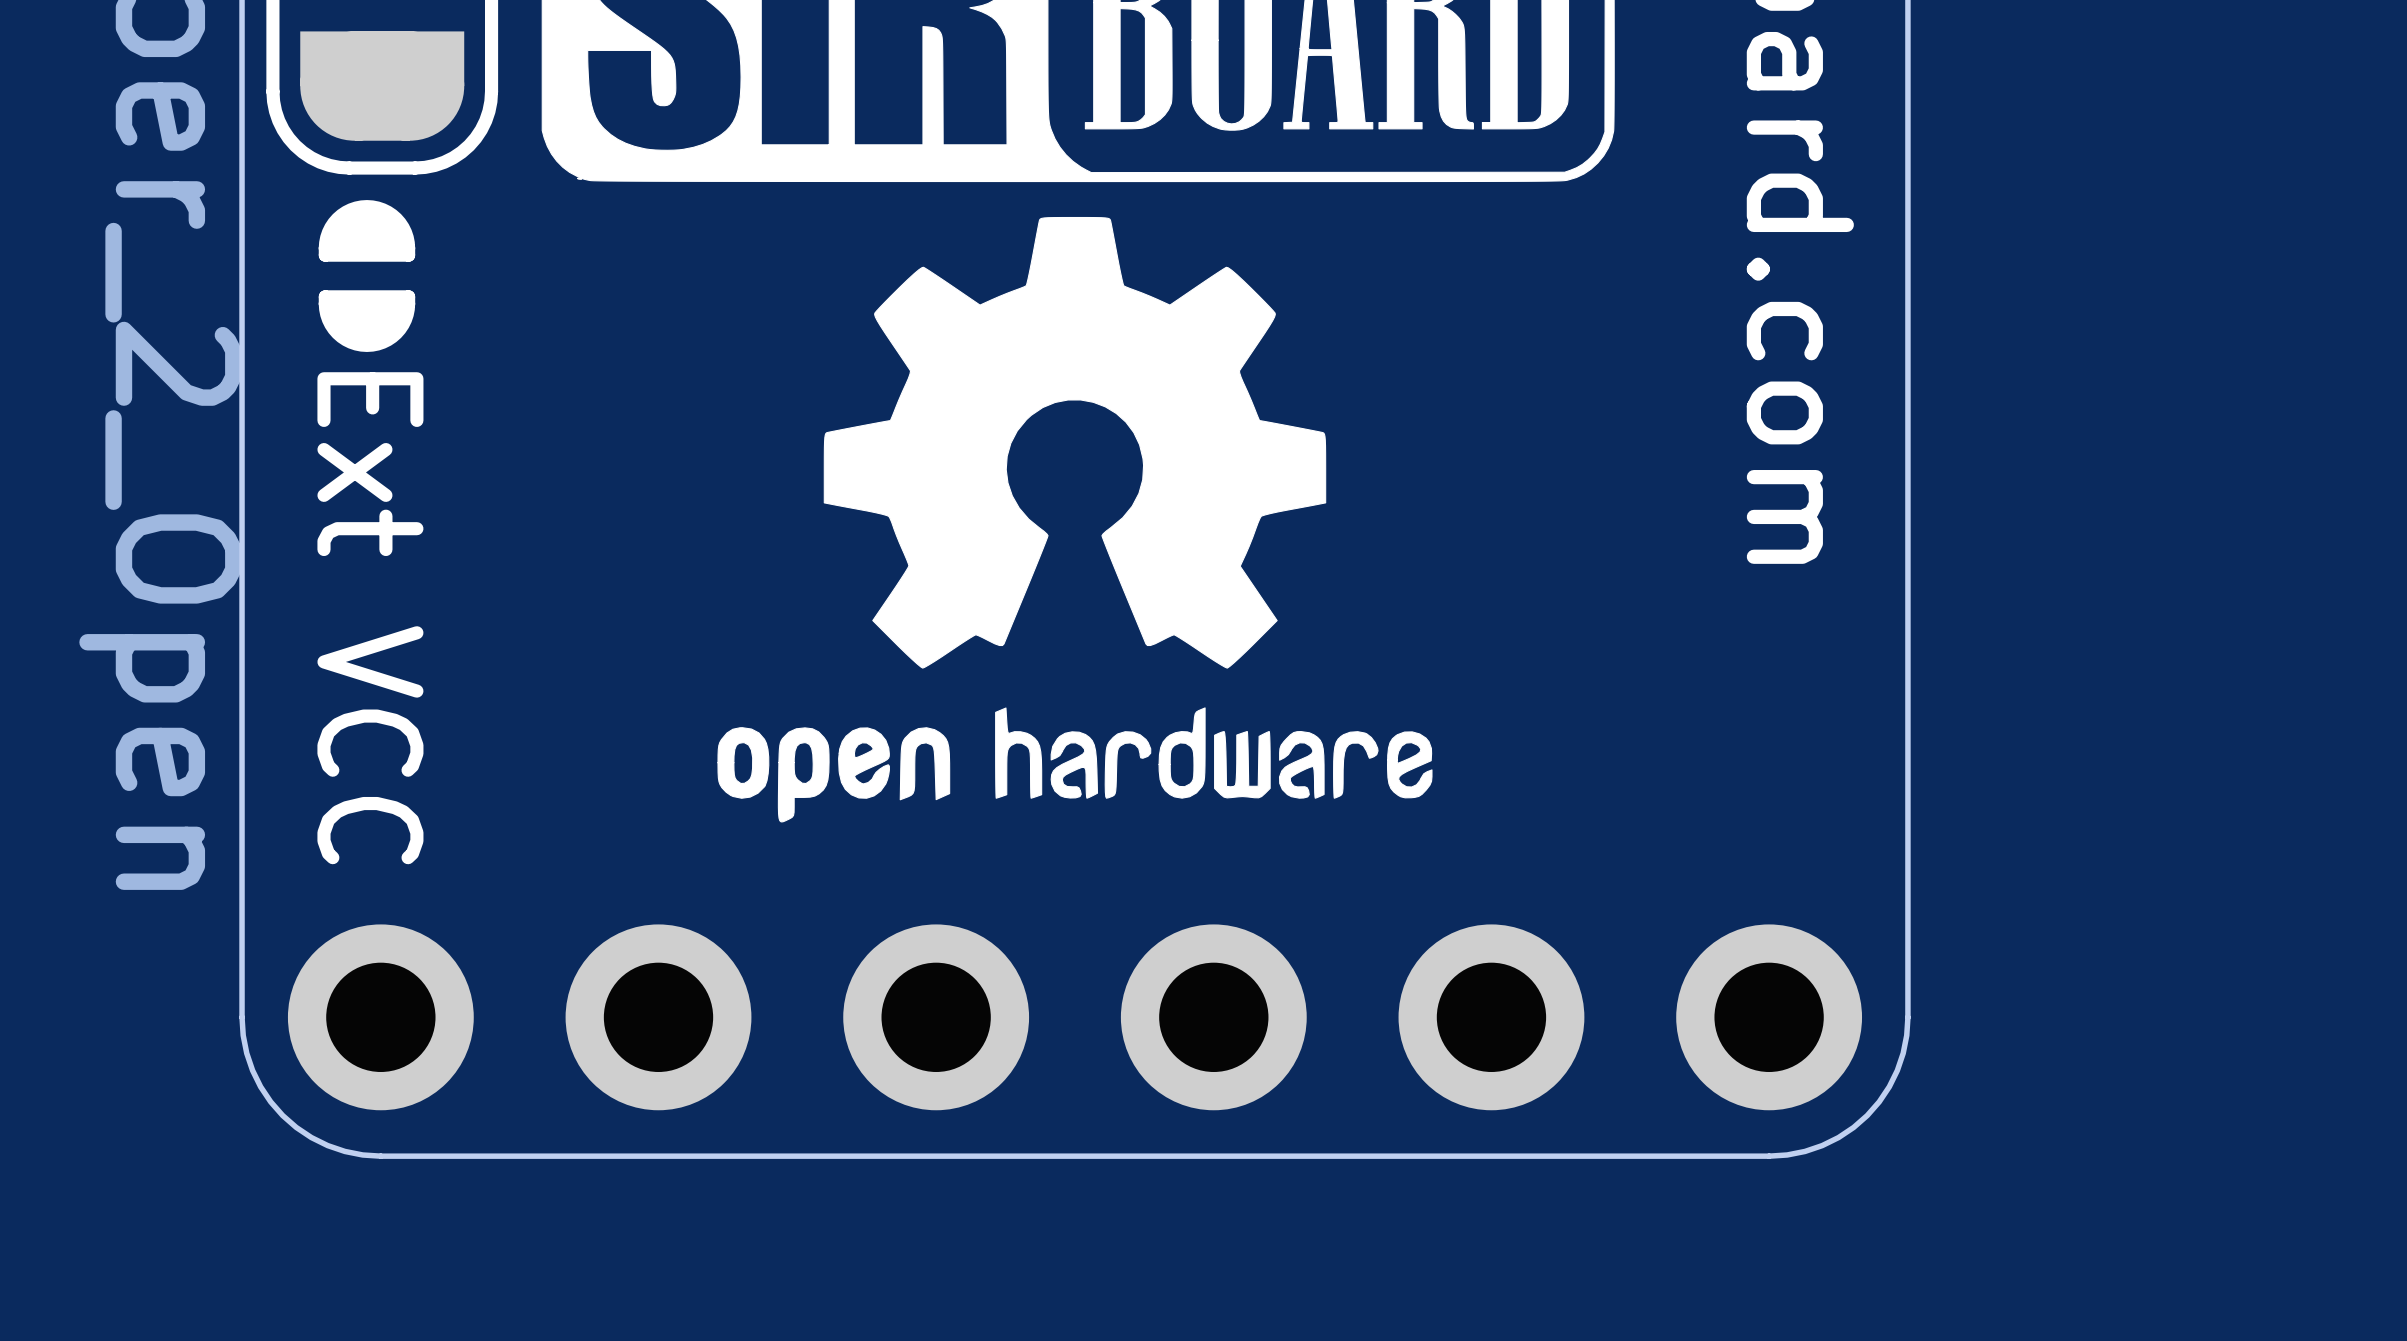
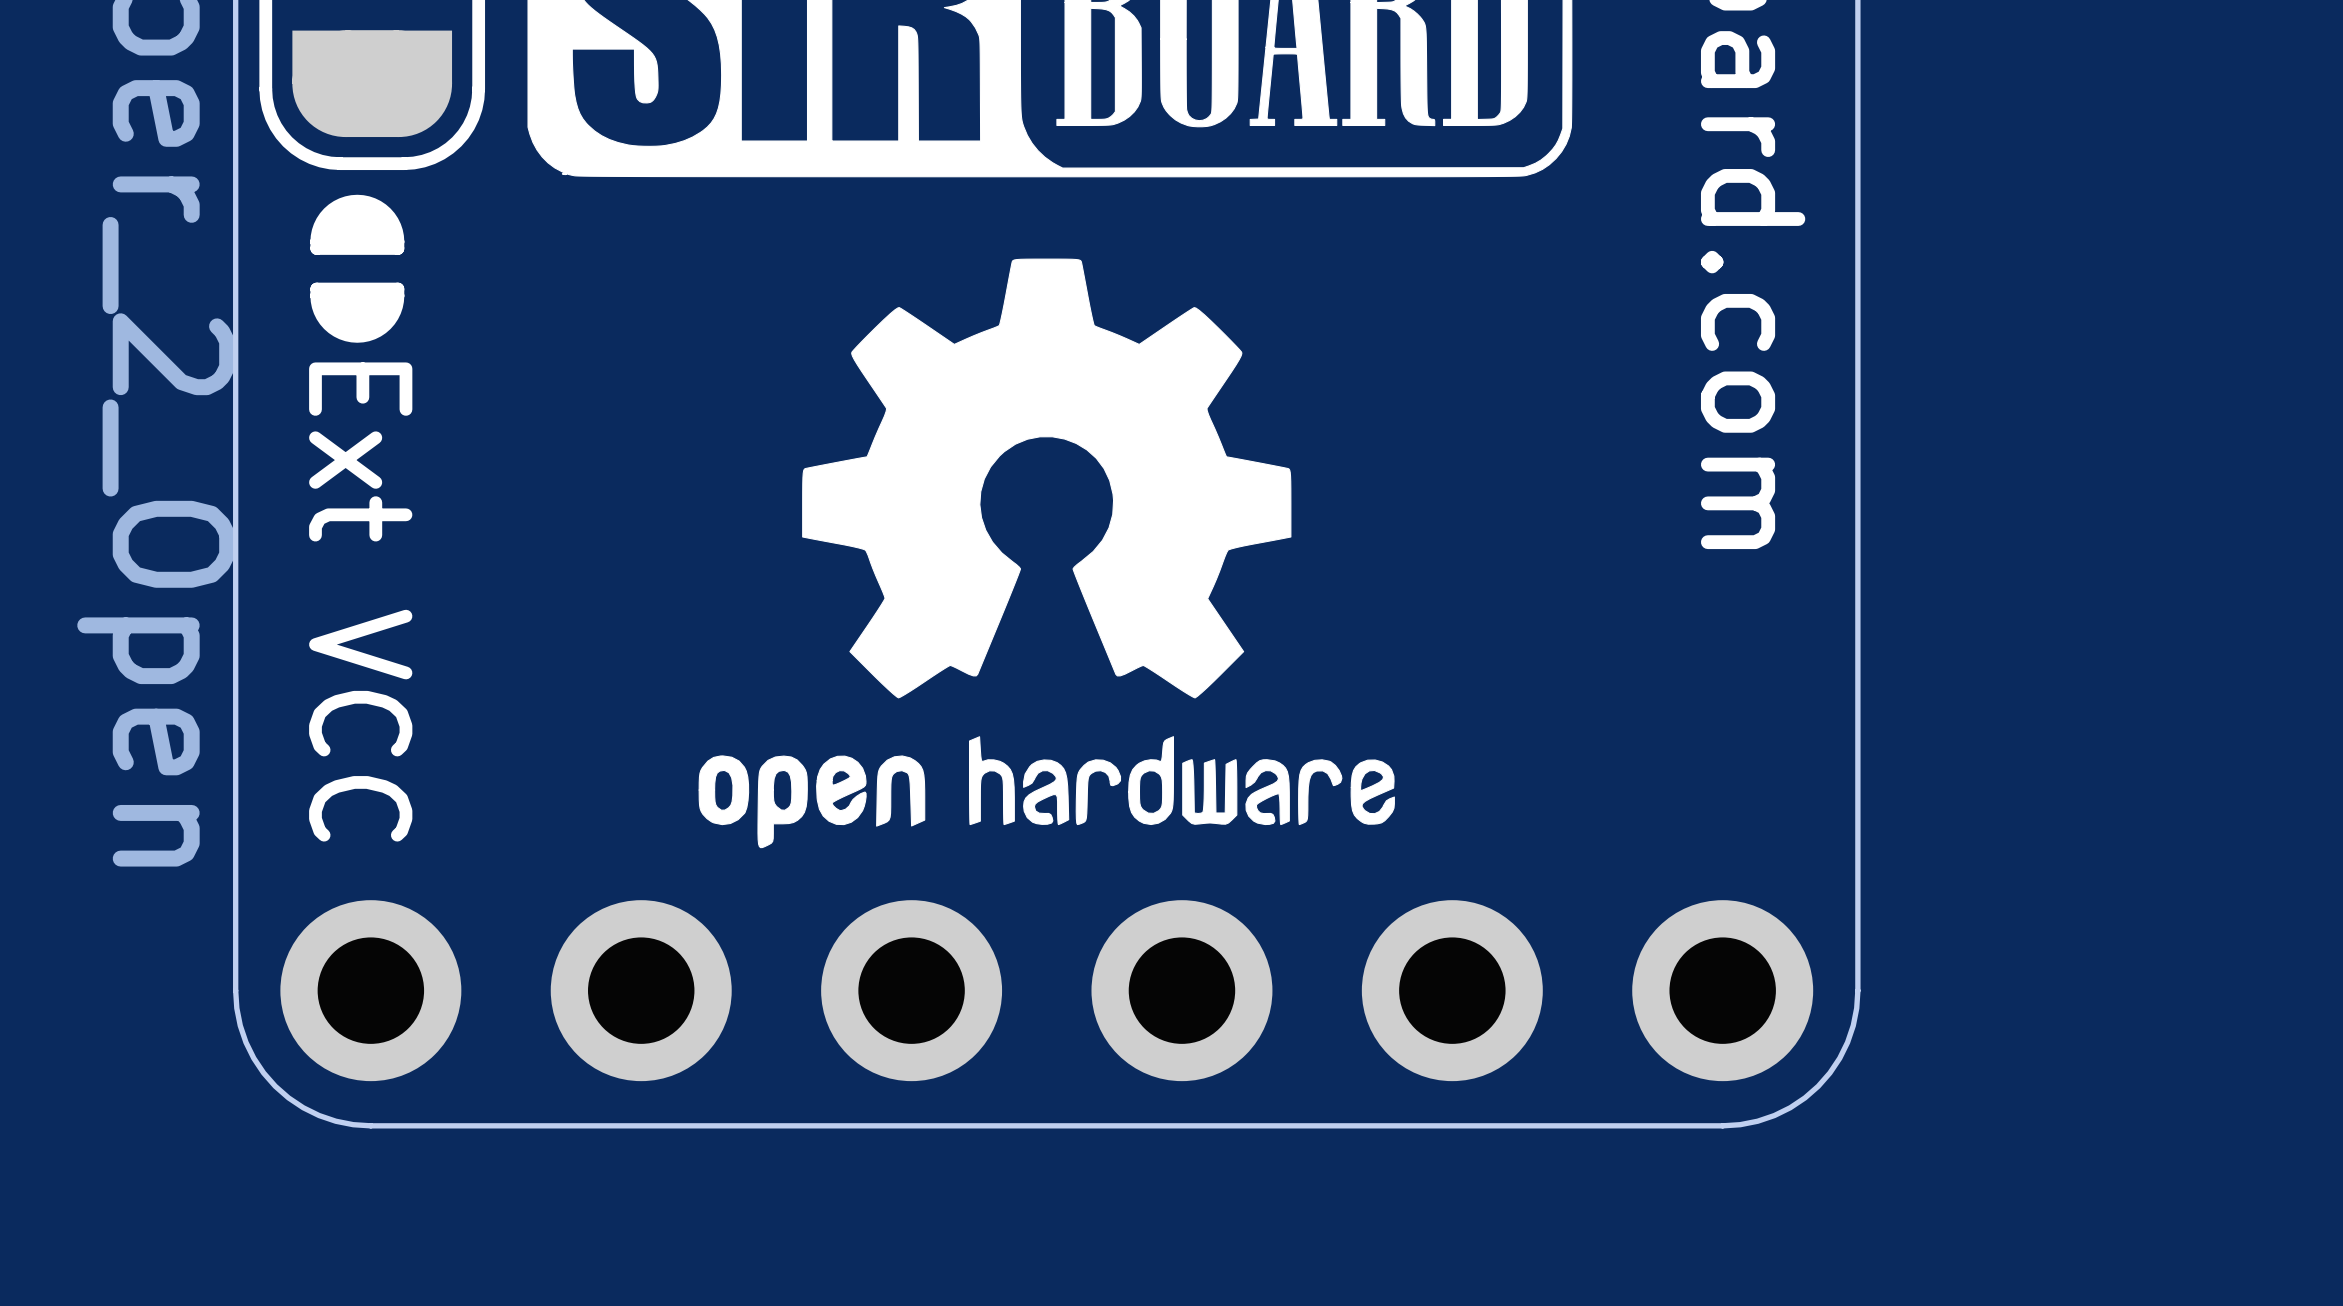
drawing position: (1074, 519) -> (1046, 553)

